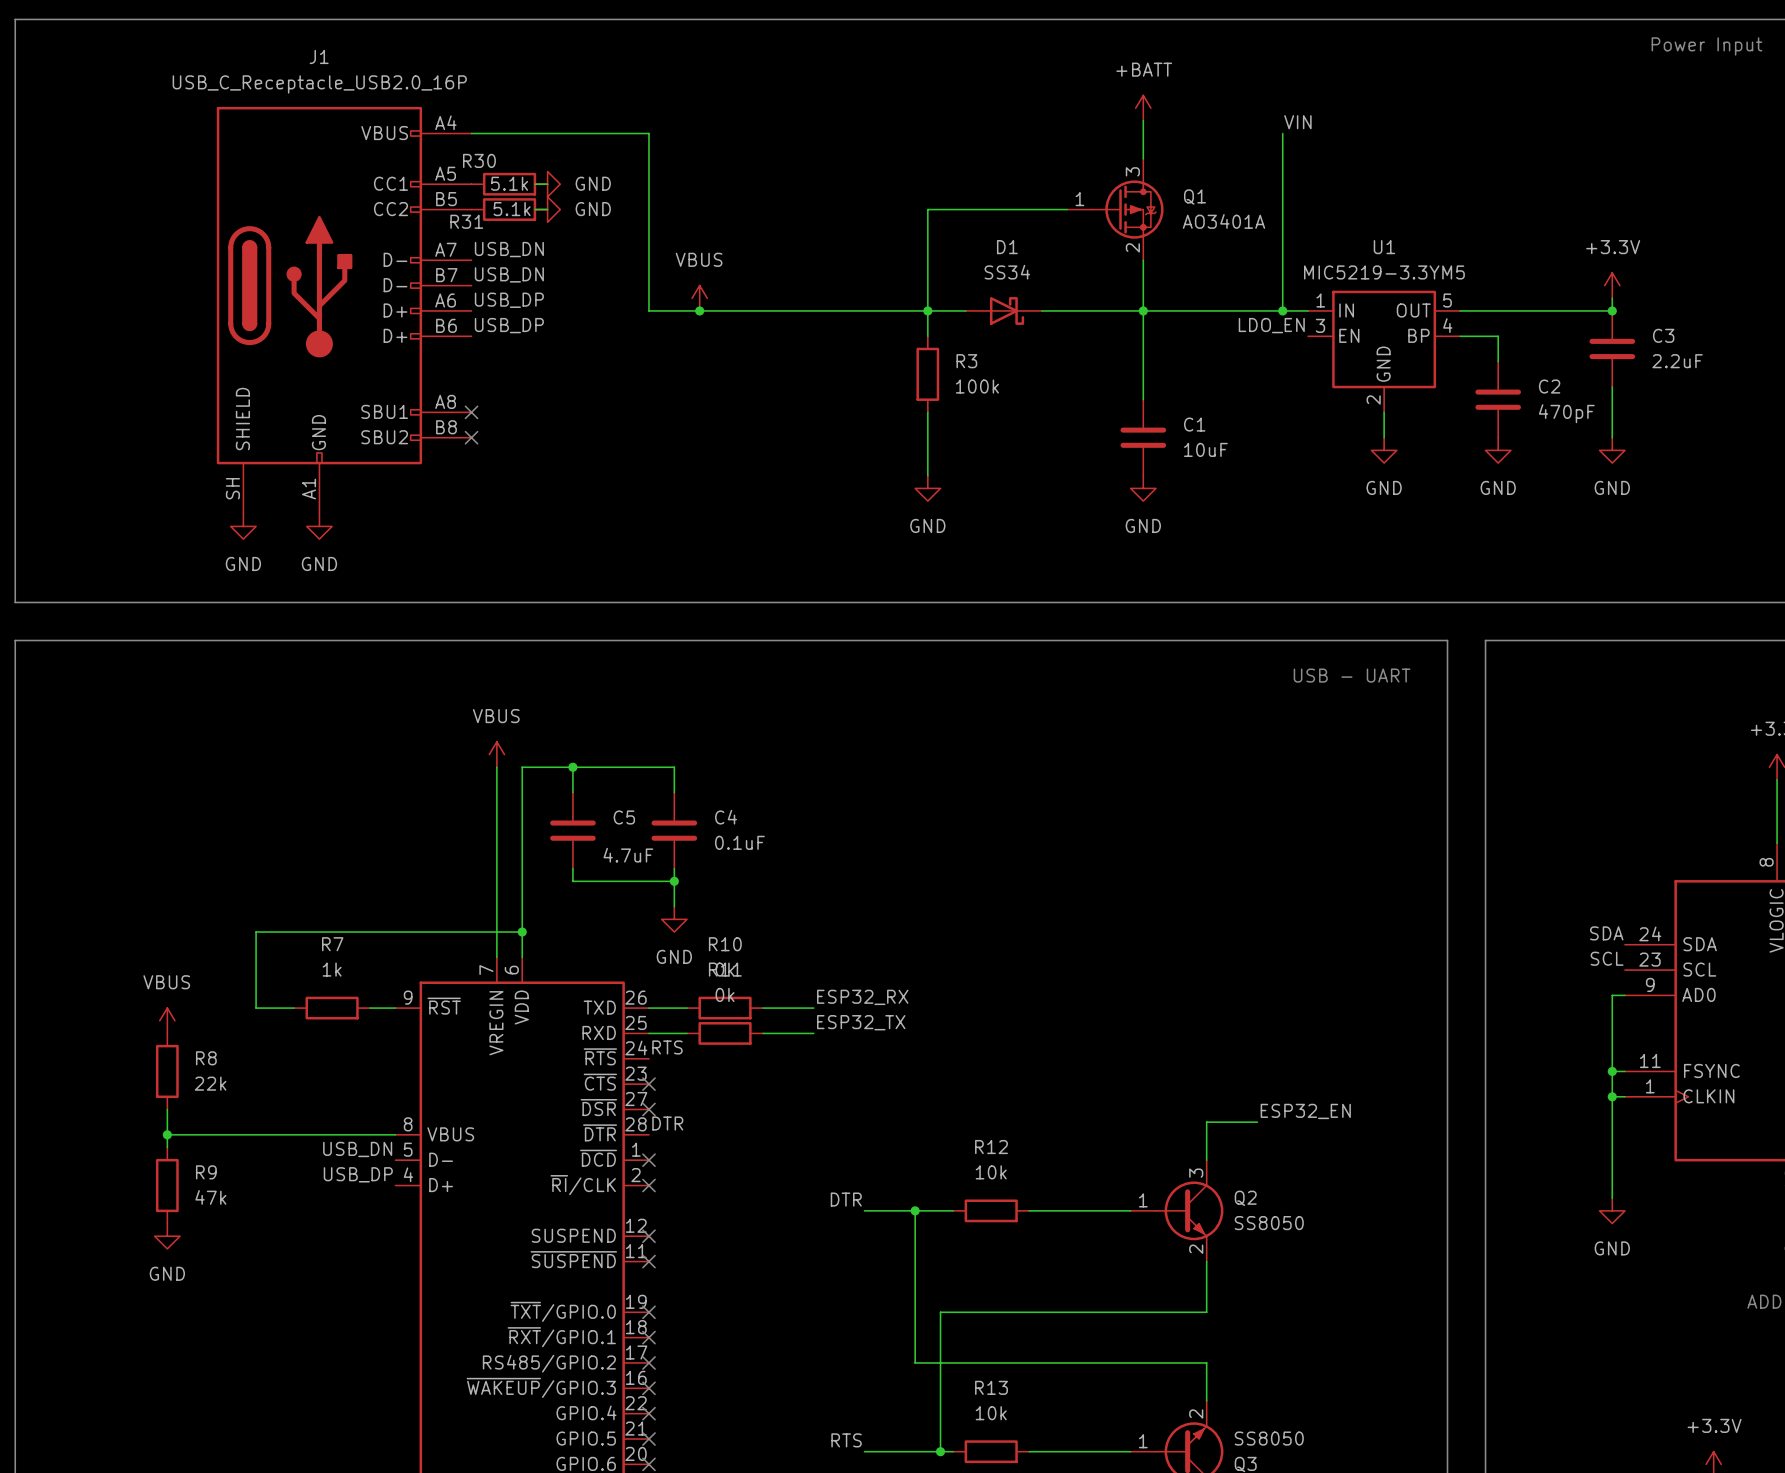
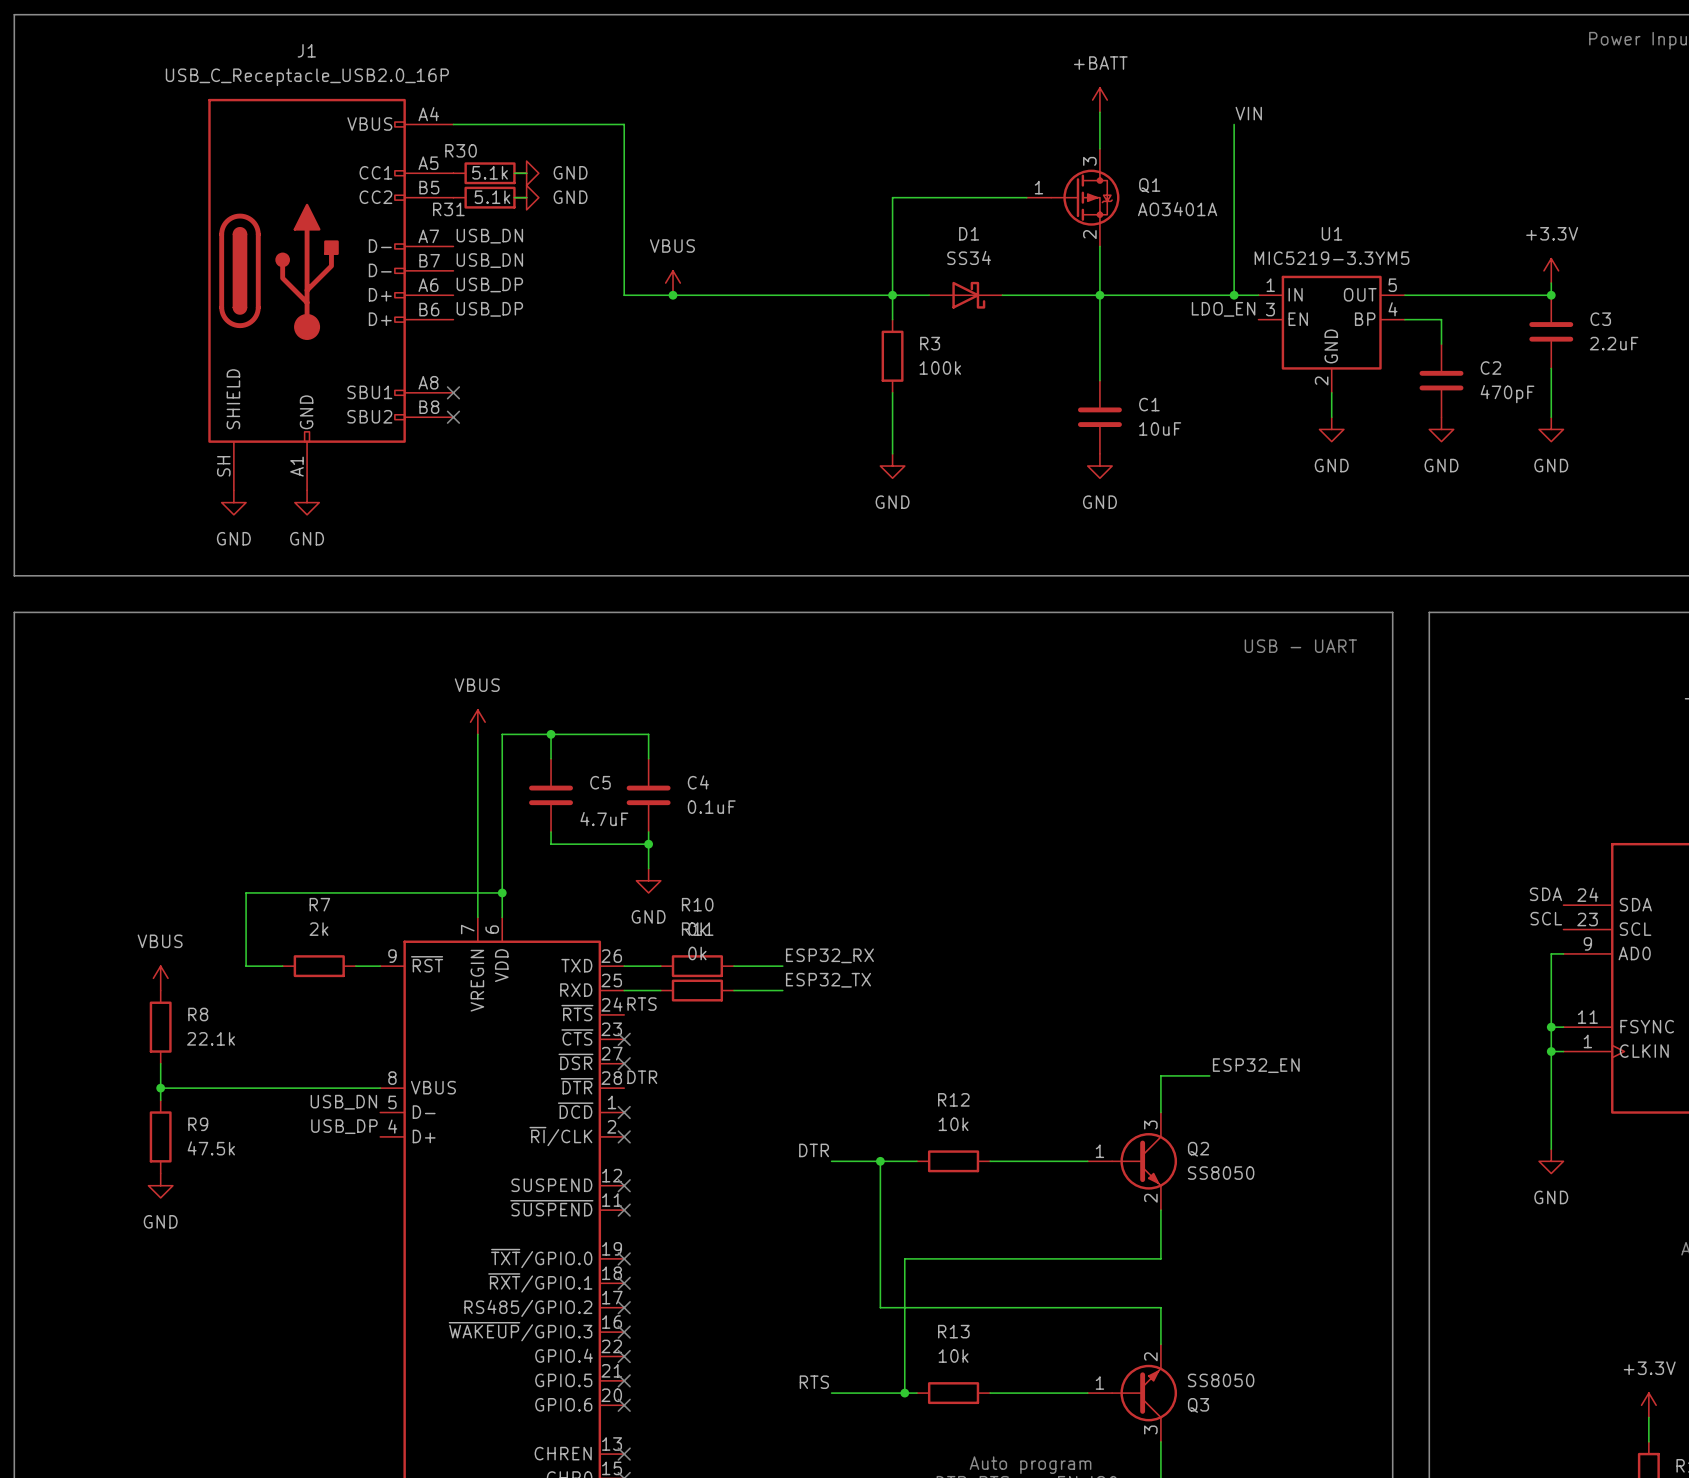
R7 value: 1k (332, 969) -> 2k (318, 929)
R8 value: 22k (210, 1083) -> 22.1k (211, 1038)
R9 value: 47k (210, 1197) -> 47.5k (211, 1148)

